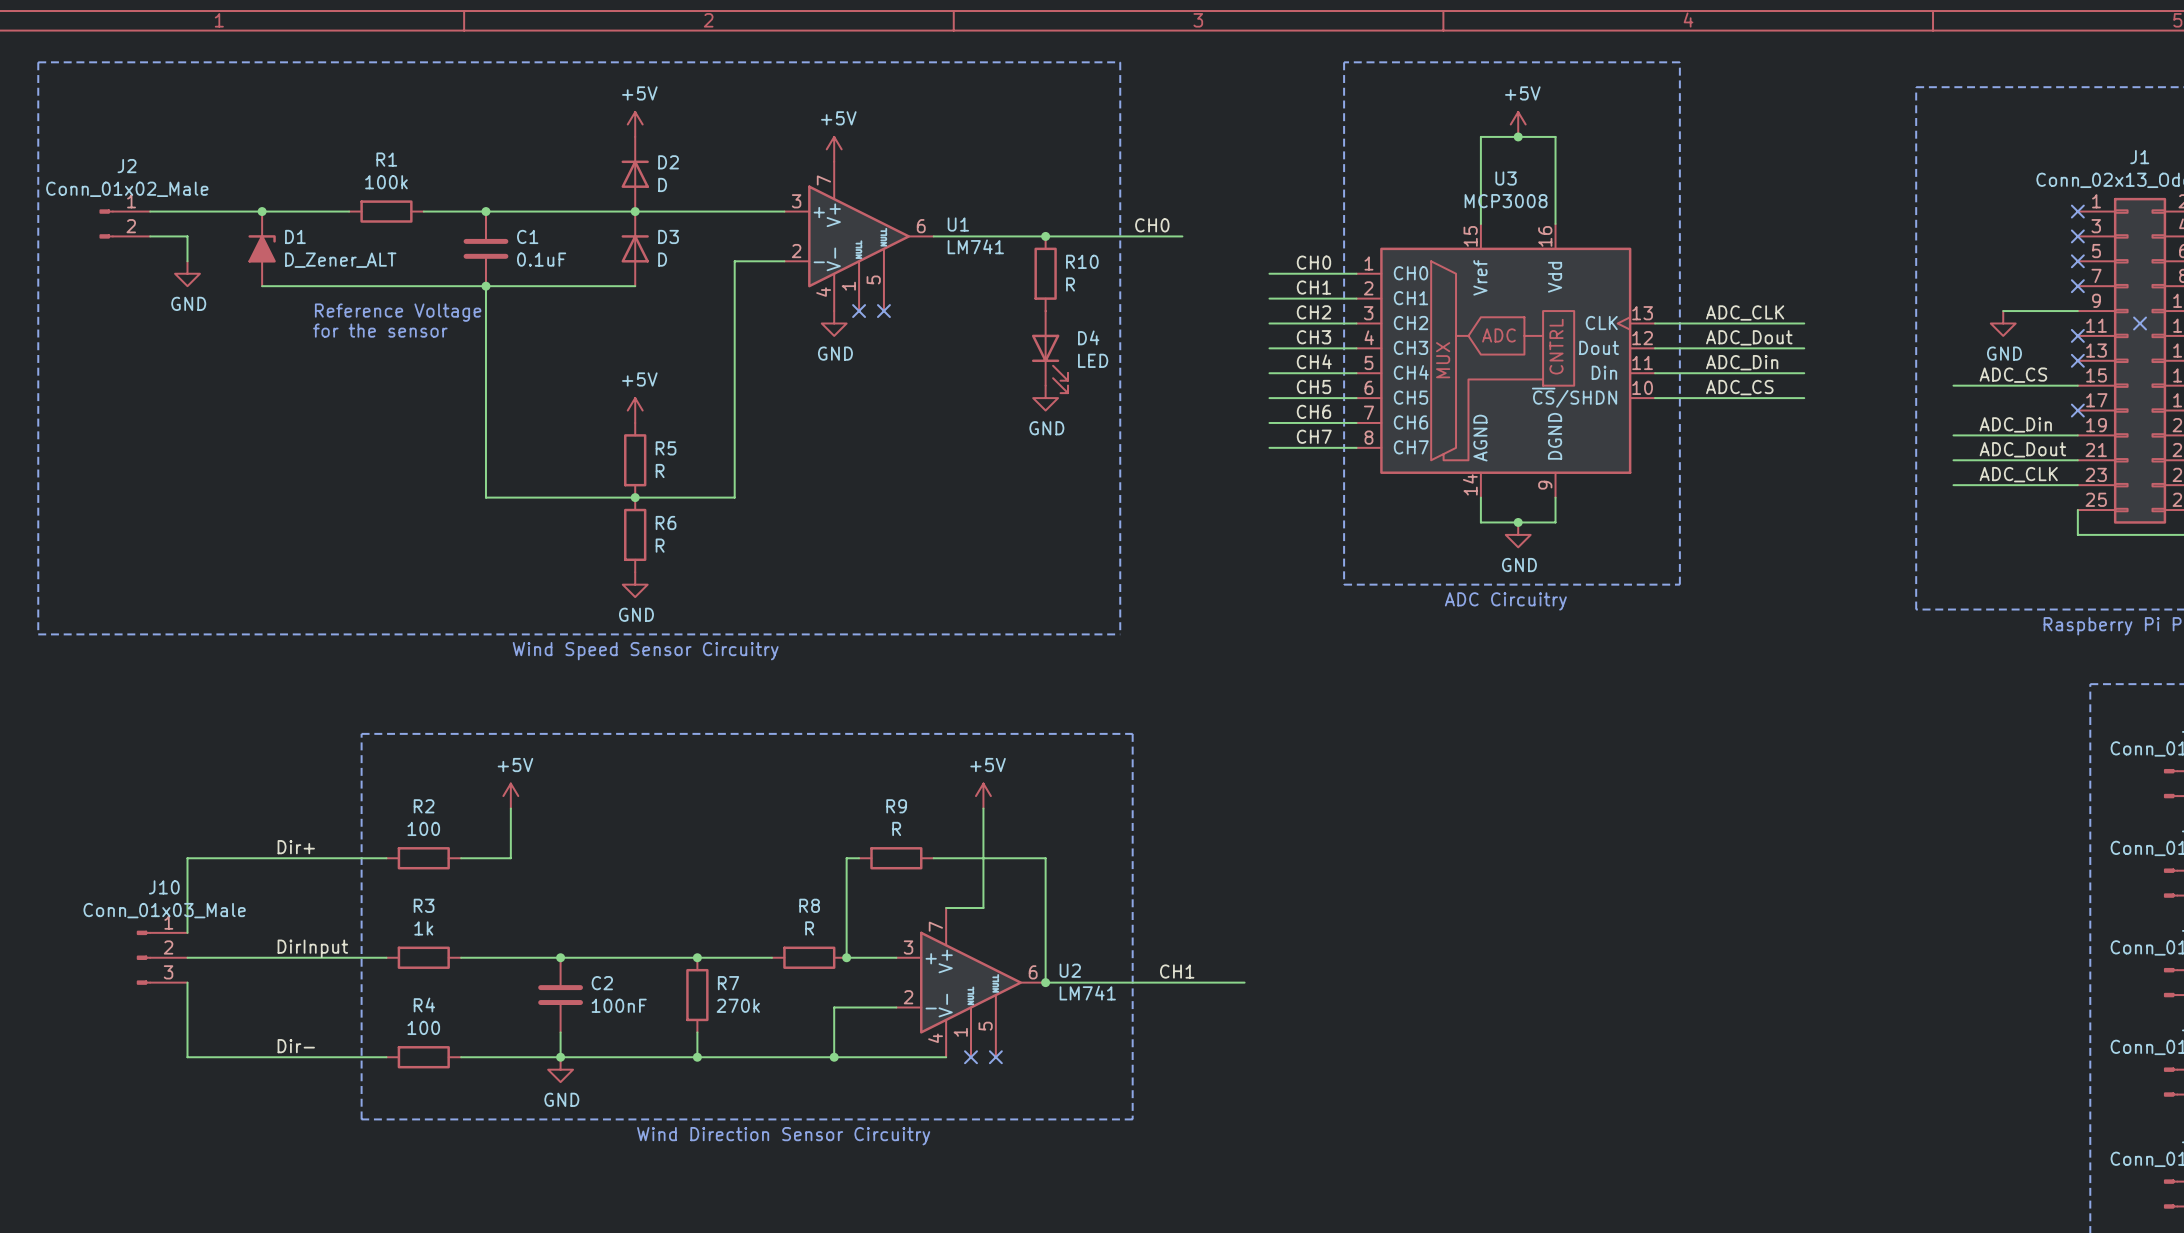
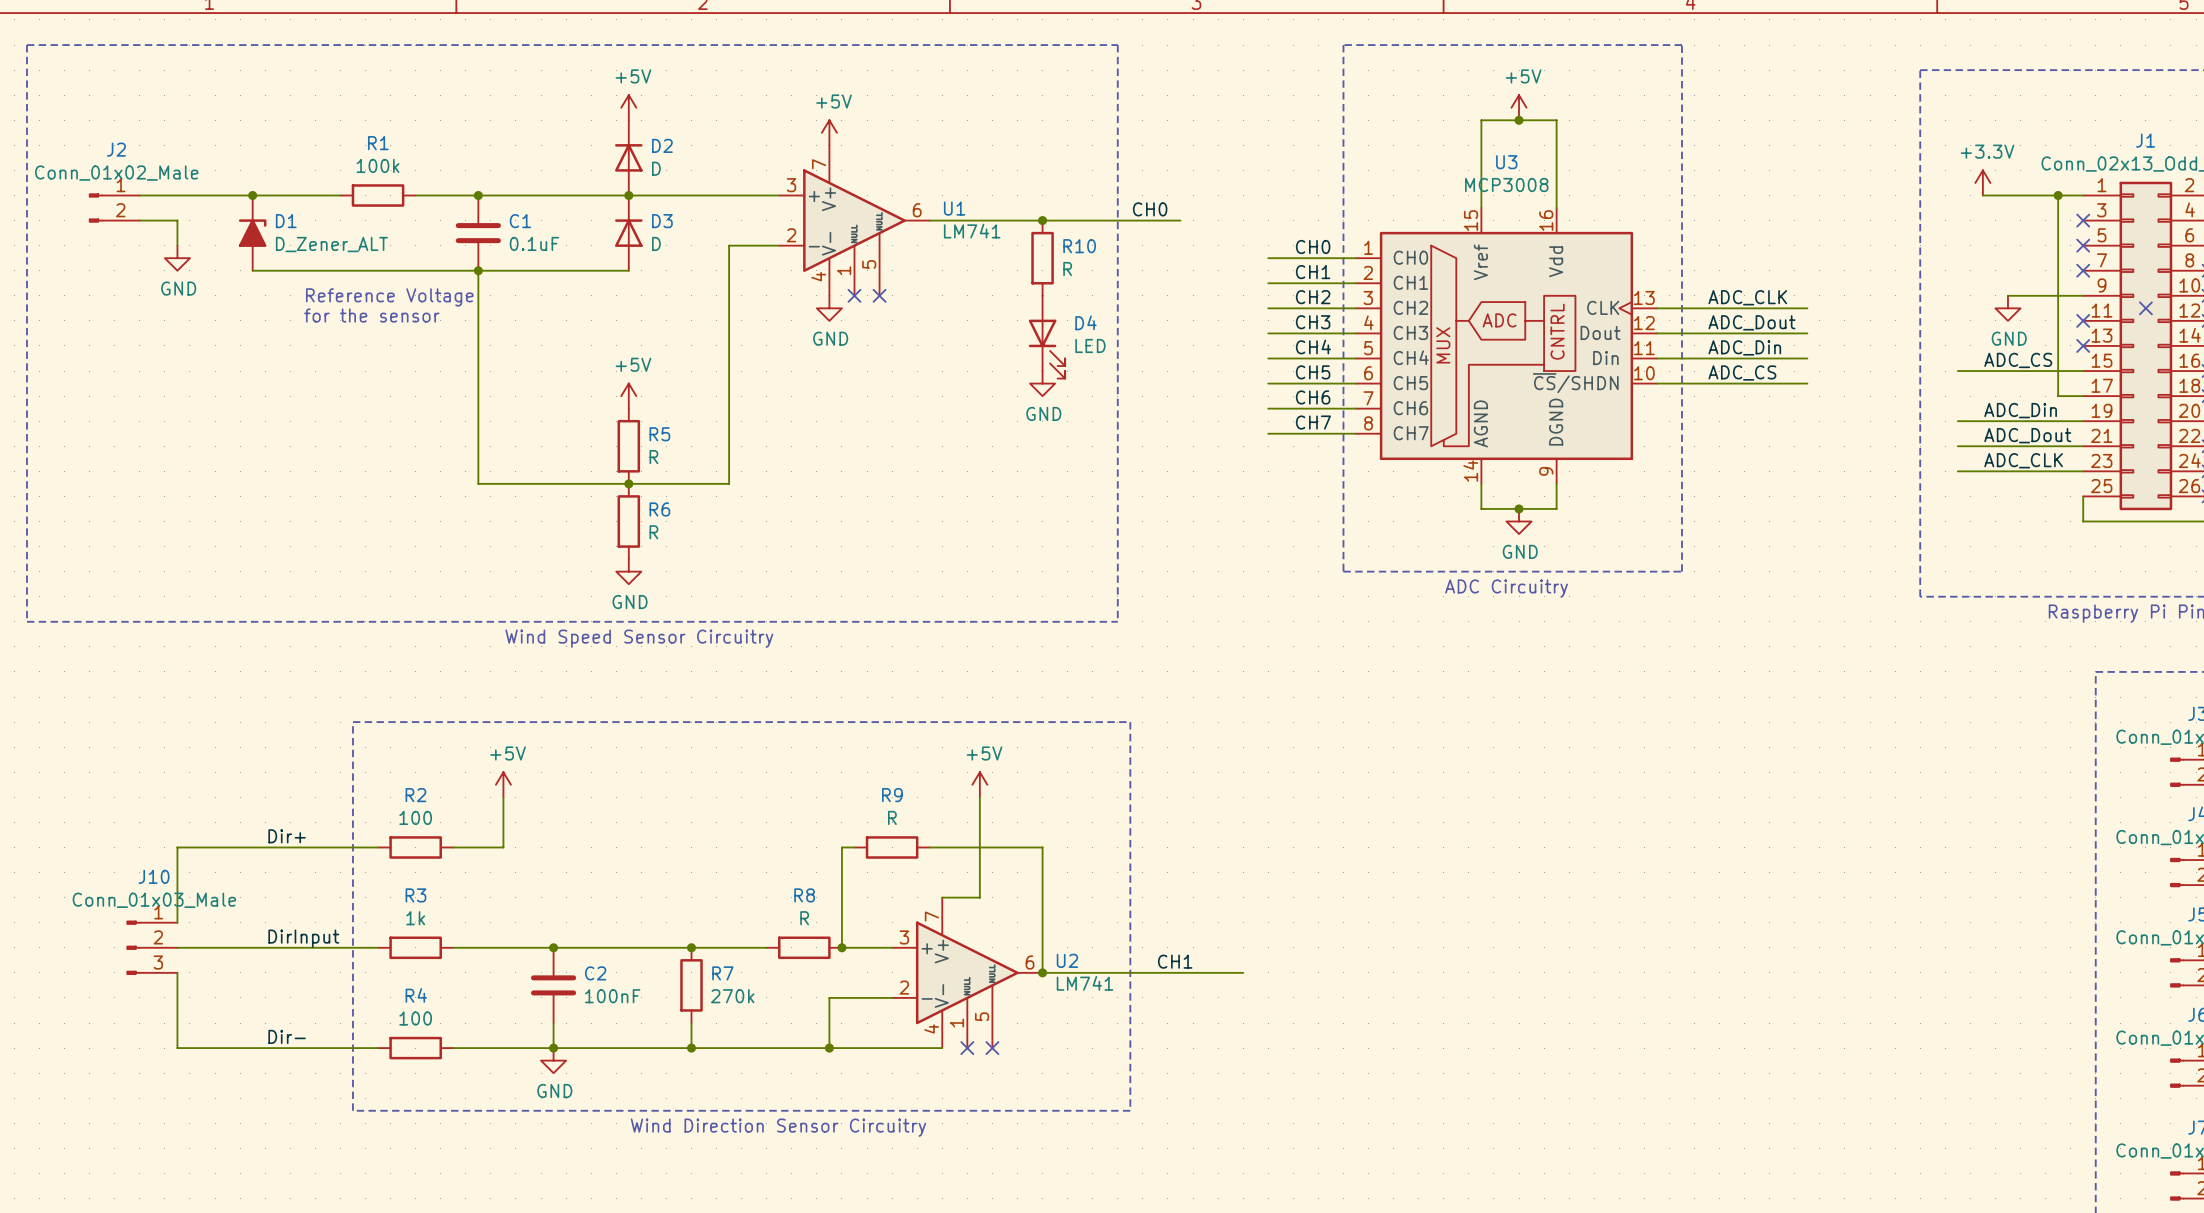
power symbol: none -> +3.3V (1982, 182)
wire: none -> (1982, 195) (2083, 195)
wire: none -> (2058, 195) (2058, 396) (2083, 396)
junction: none -> (2058, 195)
no-connect mark: (2077, 211) -> none
no-connect mark: (2077, 410) -> none

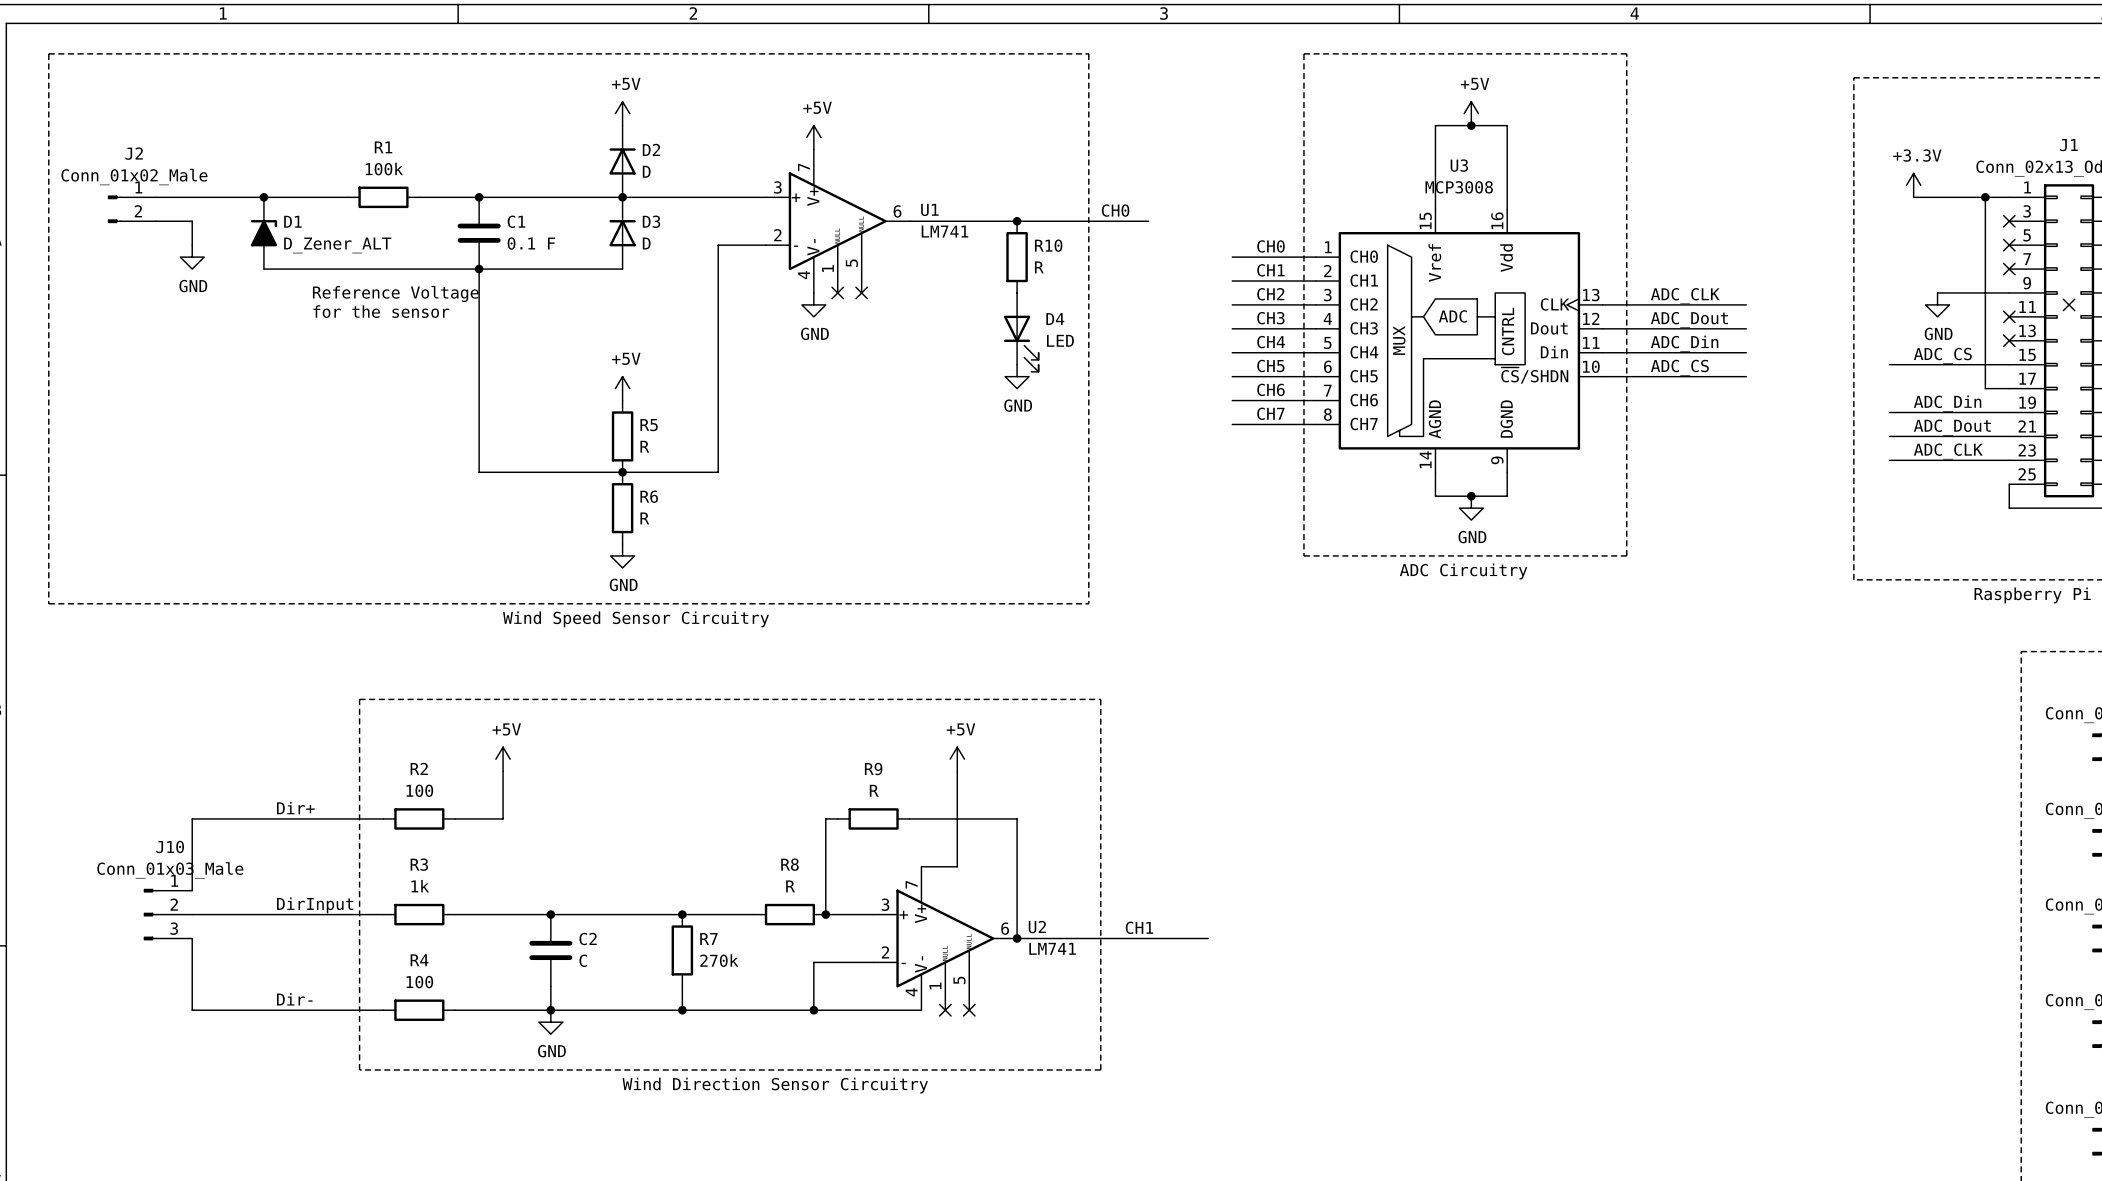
C1 value: 0.1uF (534, 243) -> 0.1 F (531, 243)
C2 value: 100nF (612, 996) -> C (583, 960)

